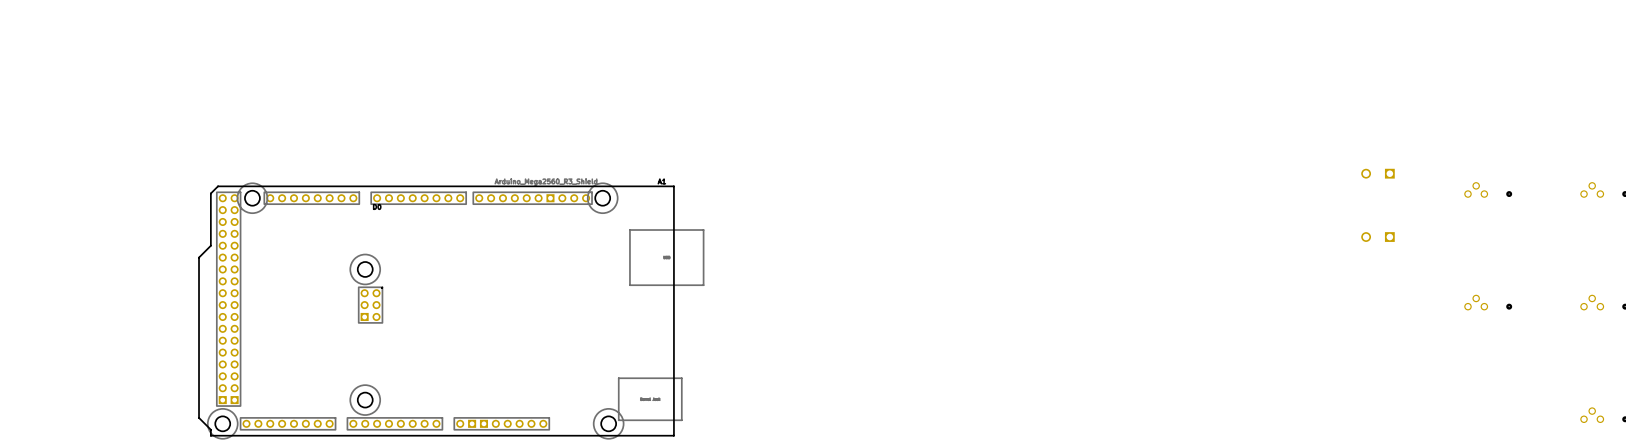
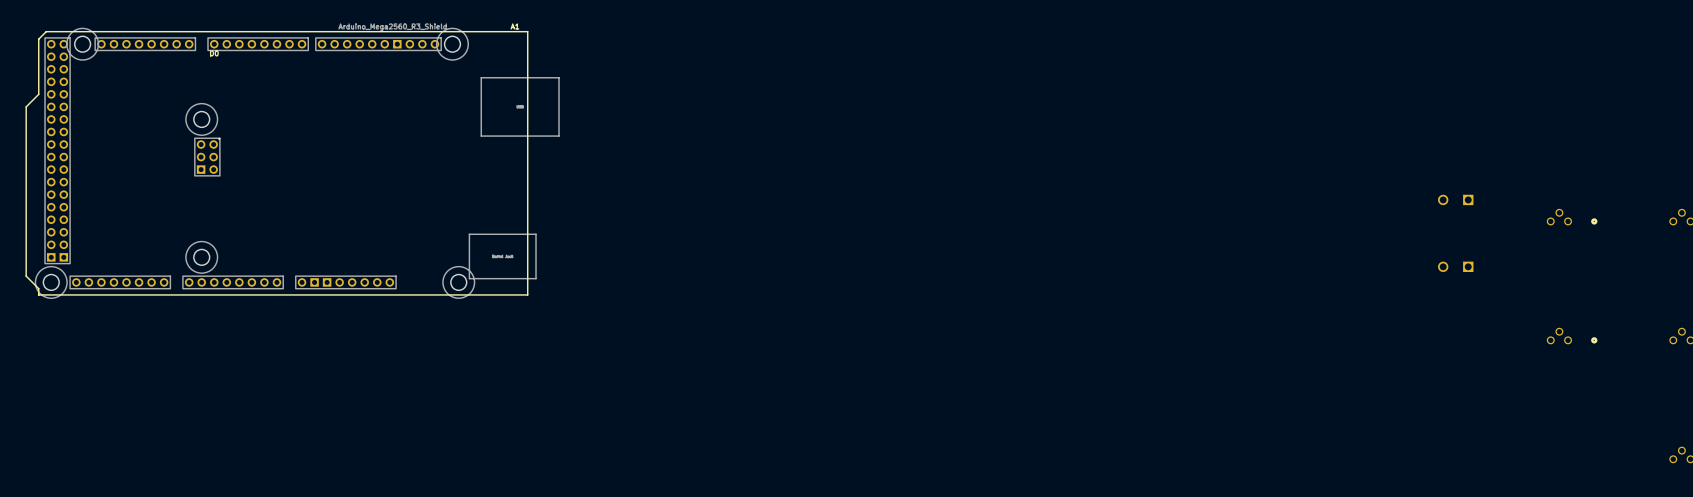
part position: (451, 311) -> (292, 163)

